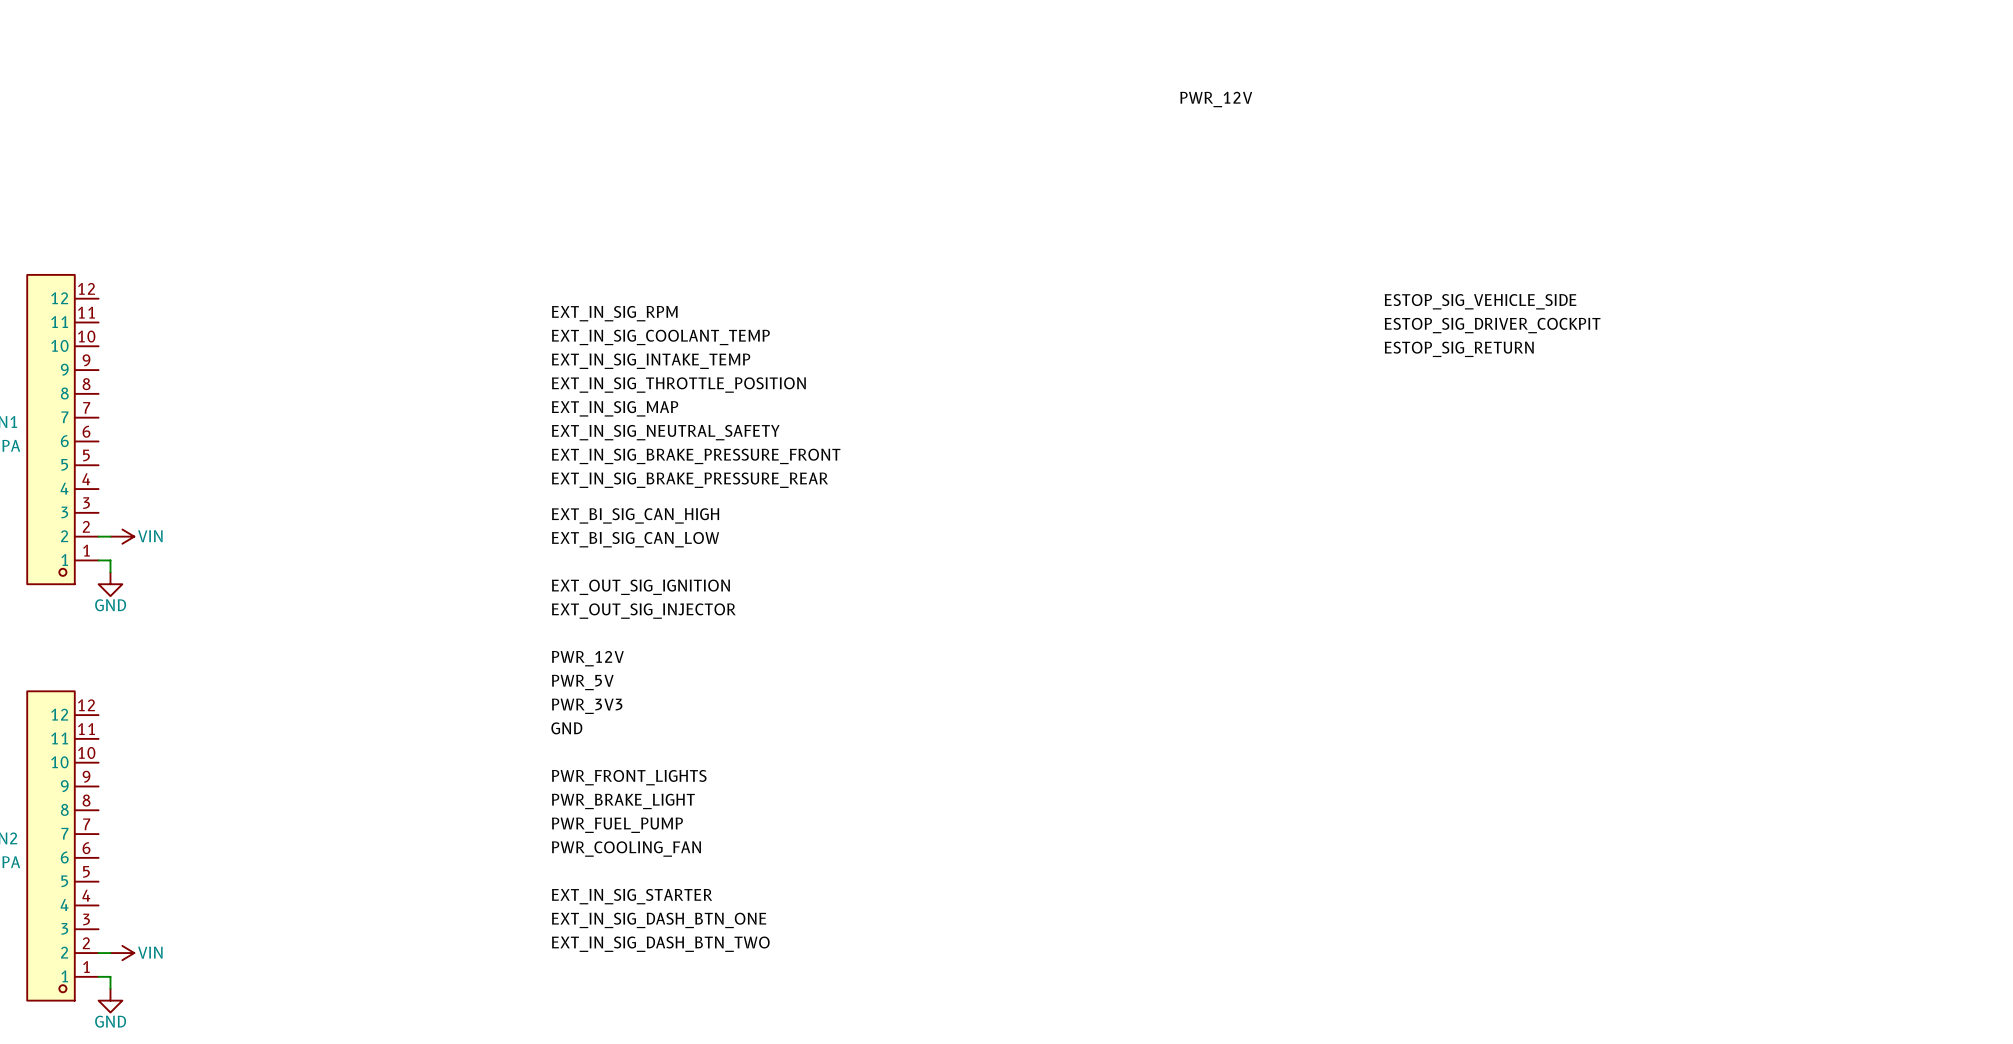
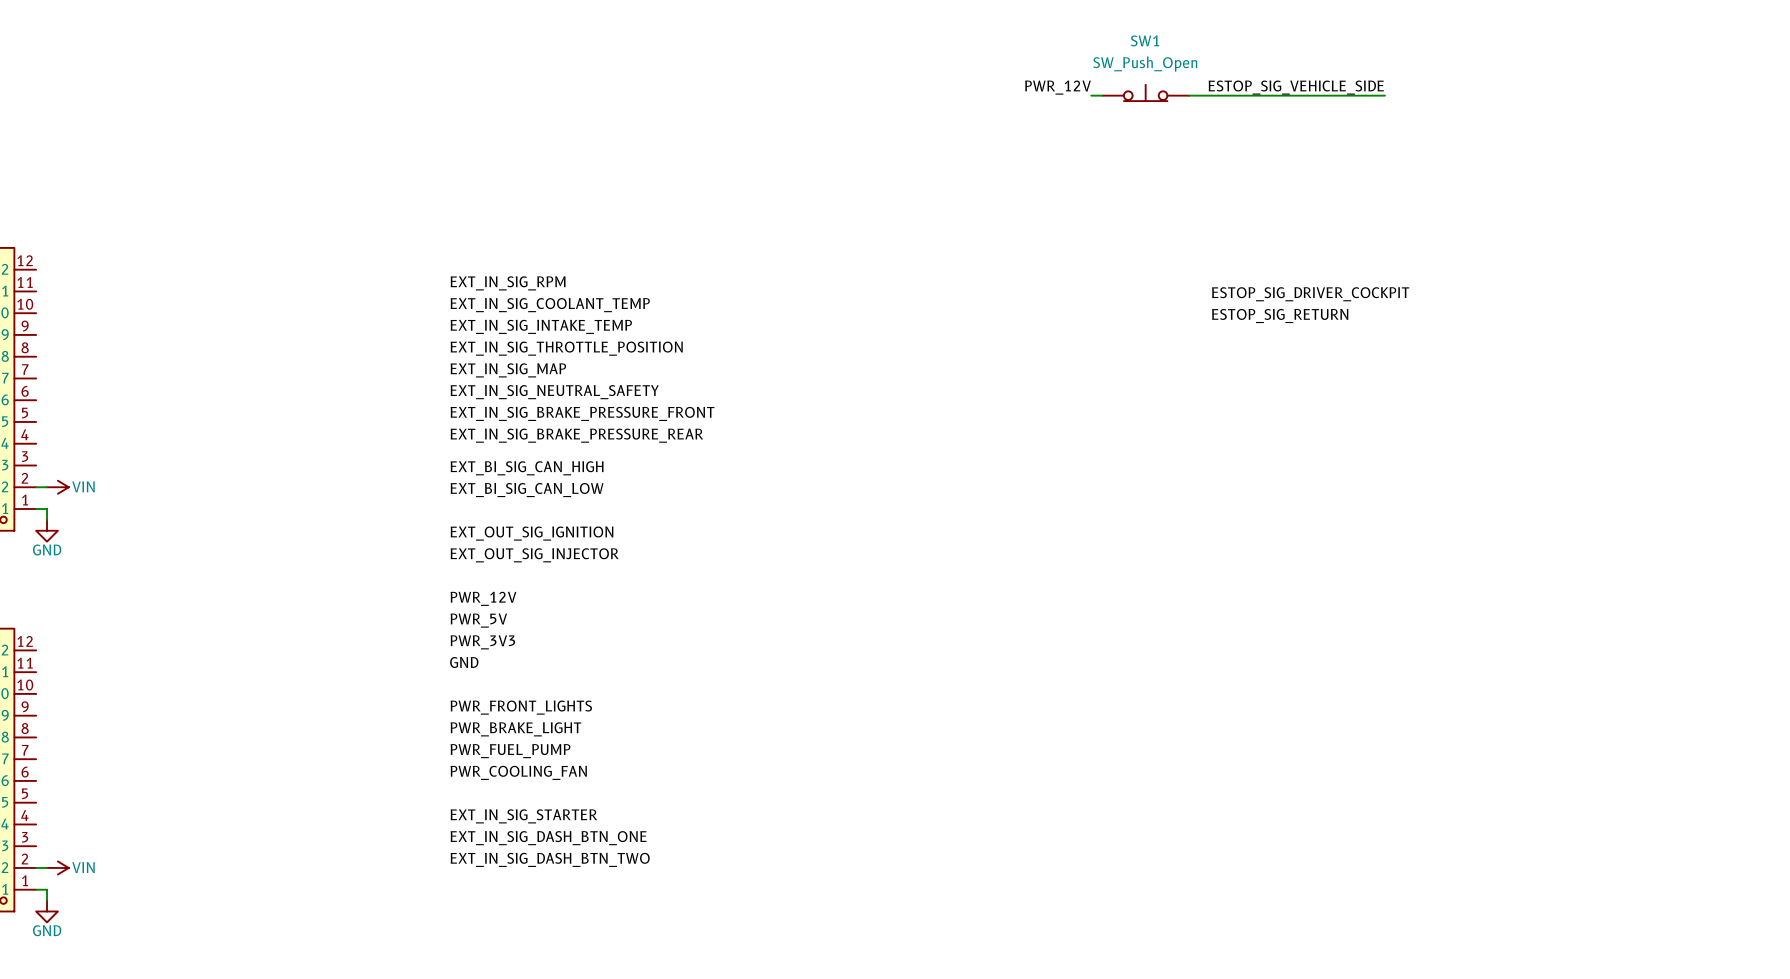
label: none -> ESTOP_SIG_VEHICLE_SIDE (1296, 87)
SW1: none -> SW_Push_Open (1145, 92)
wire: none -> (1091, 95) (1102, 95)
wire: none -> (1189, 95) (1384, 95)
label: ESTOP_SIG_VEHICLE_SIDE (1480, 301) -> none

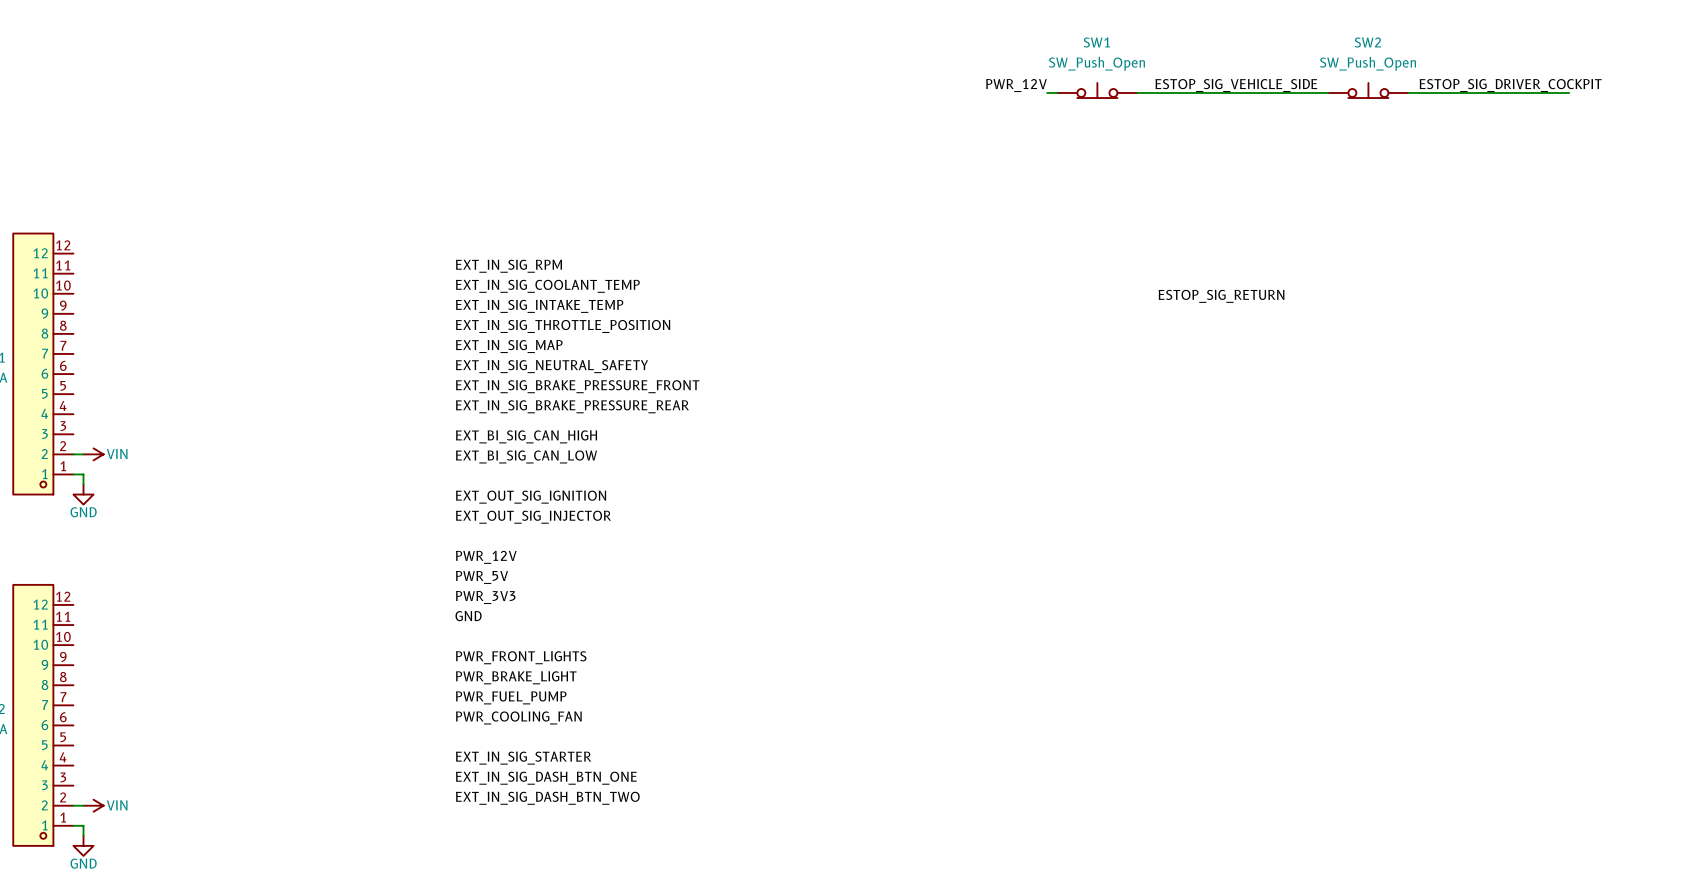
label: none -> ESTOP_SIG_DRIVER_COCKPIT (1510, 85)
SW2: none -> SW_Push_Open (1368, 90)
wire: none -> (1318, 92) (1328, 92)
wire: none -> (1408, 92) (1569, 92)
label: ESTOP_SIG_DRIVER_COCKPIT (1310, 294) -> none

